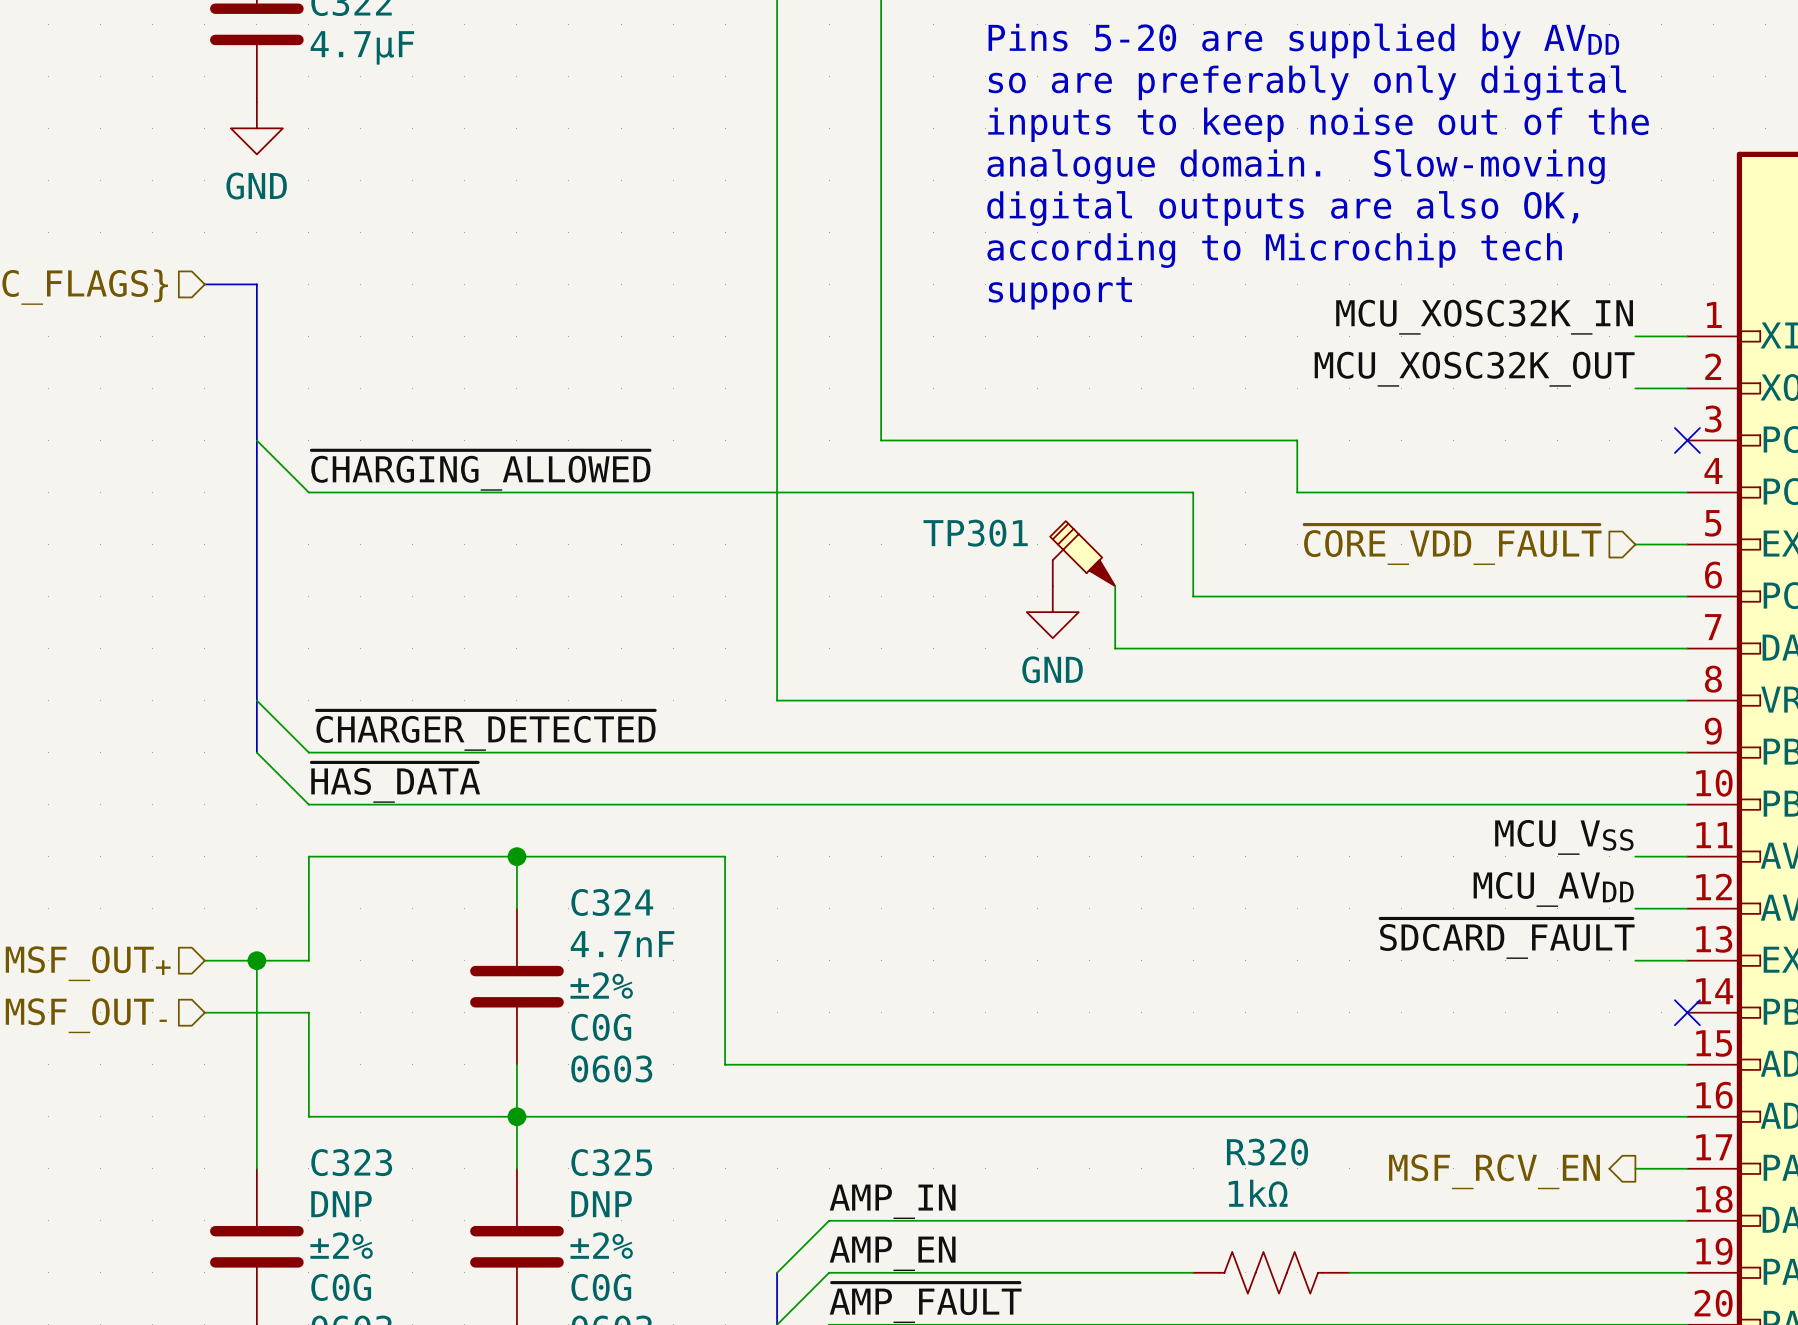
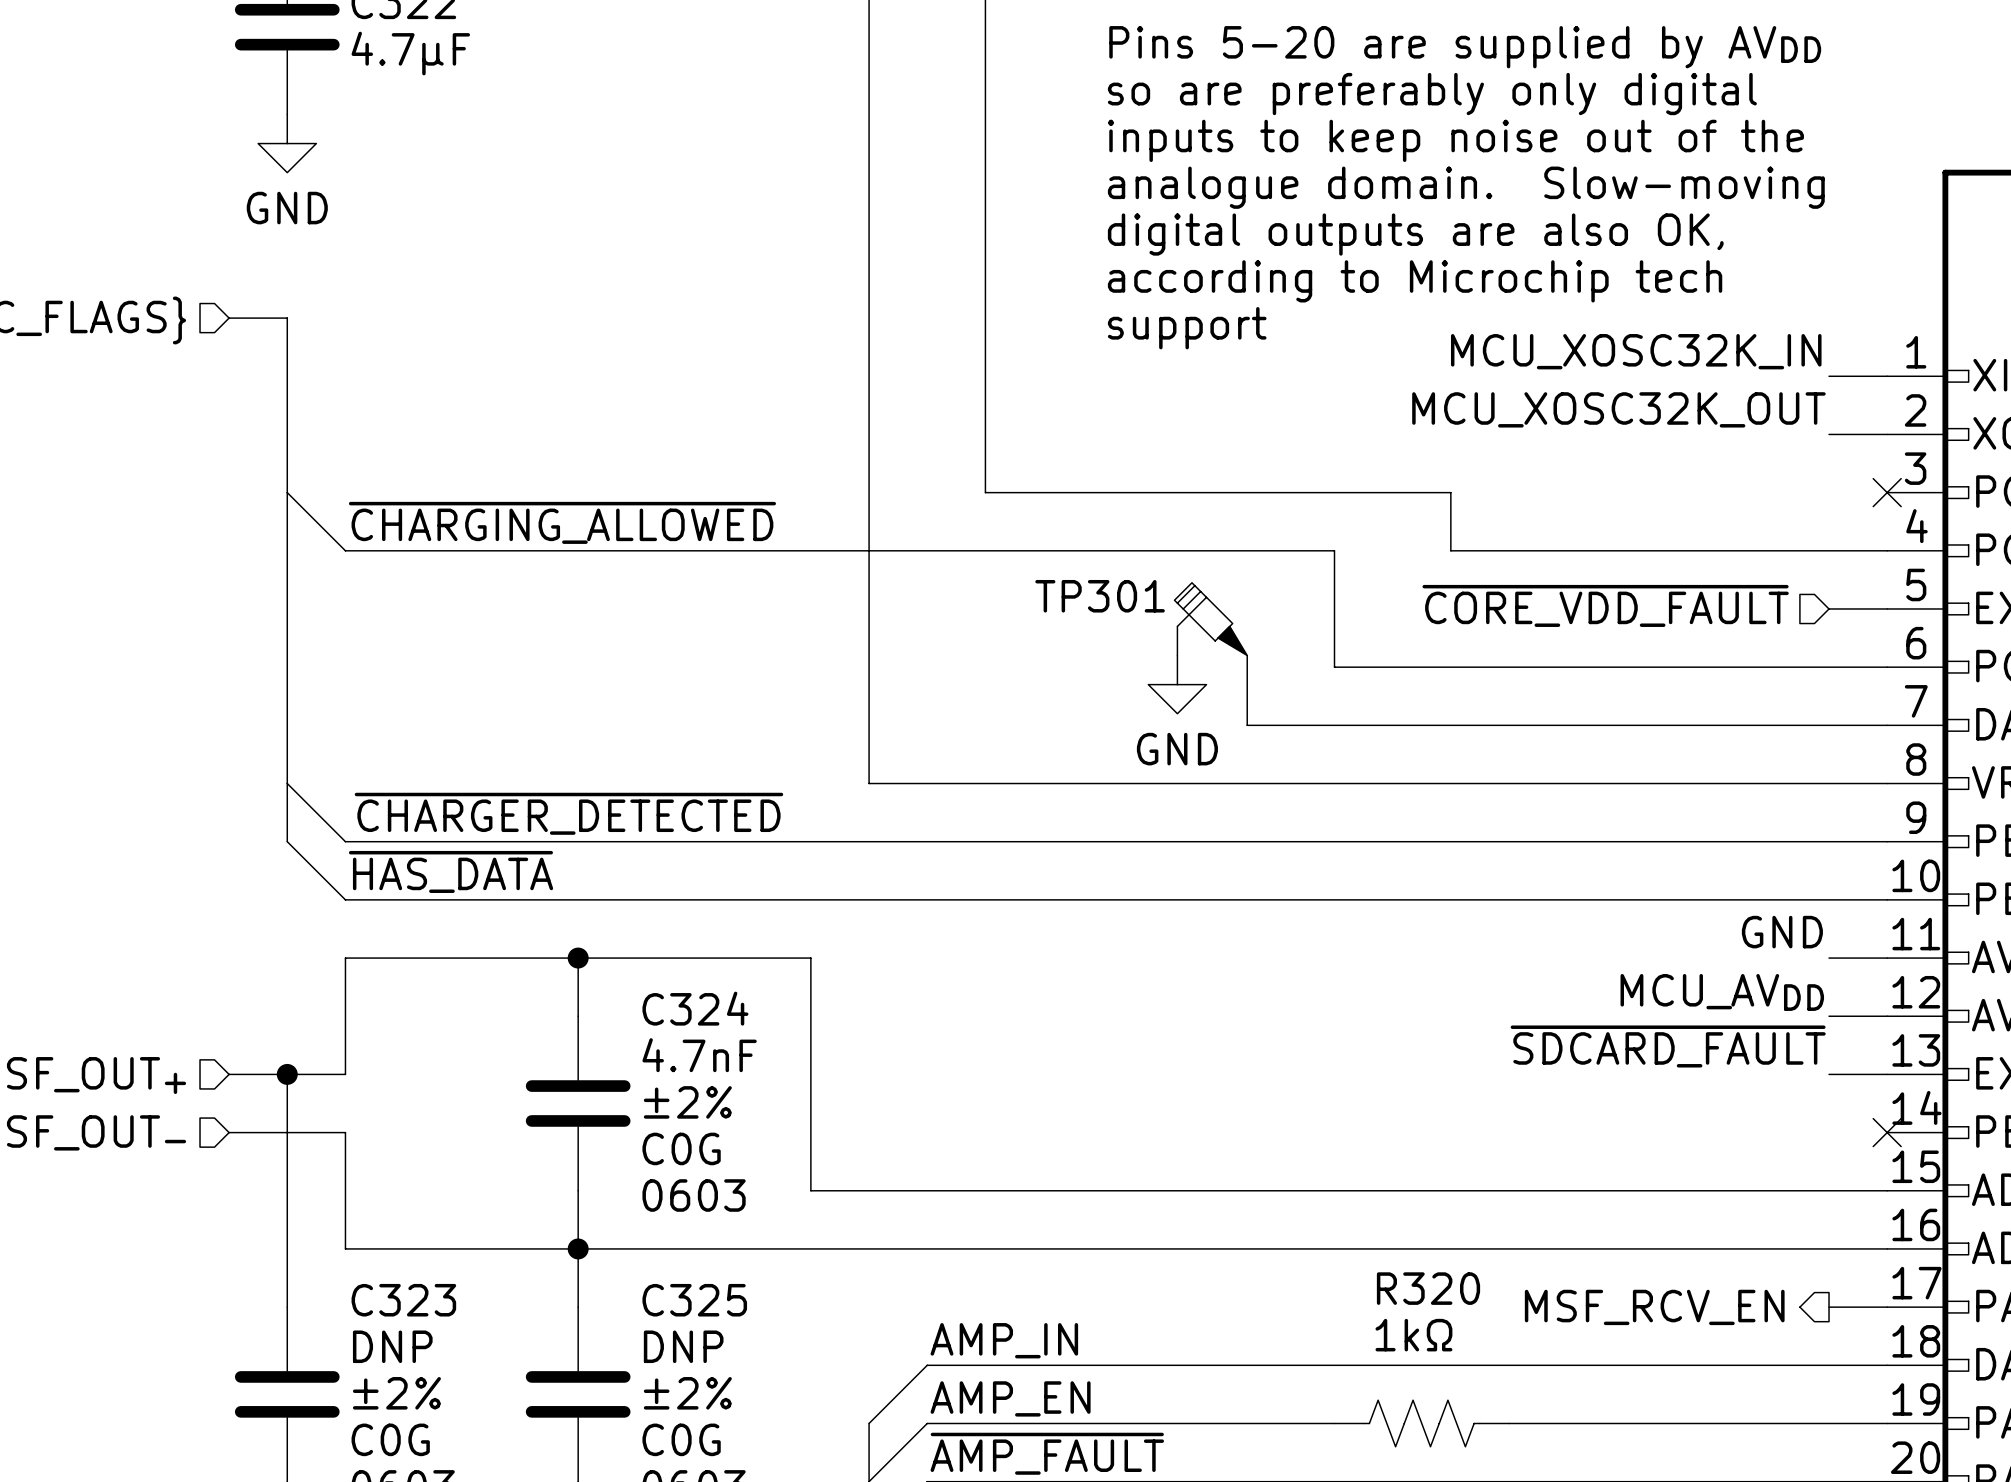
label: MCU_VSS (1564, 837) -> GND (1782, 932)

